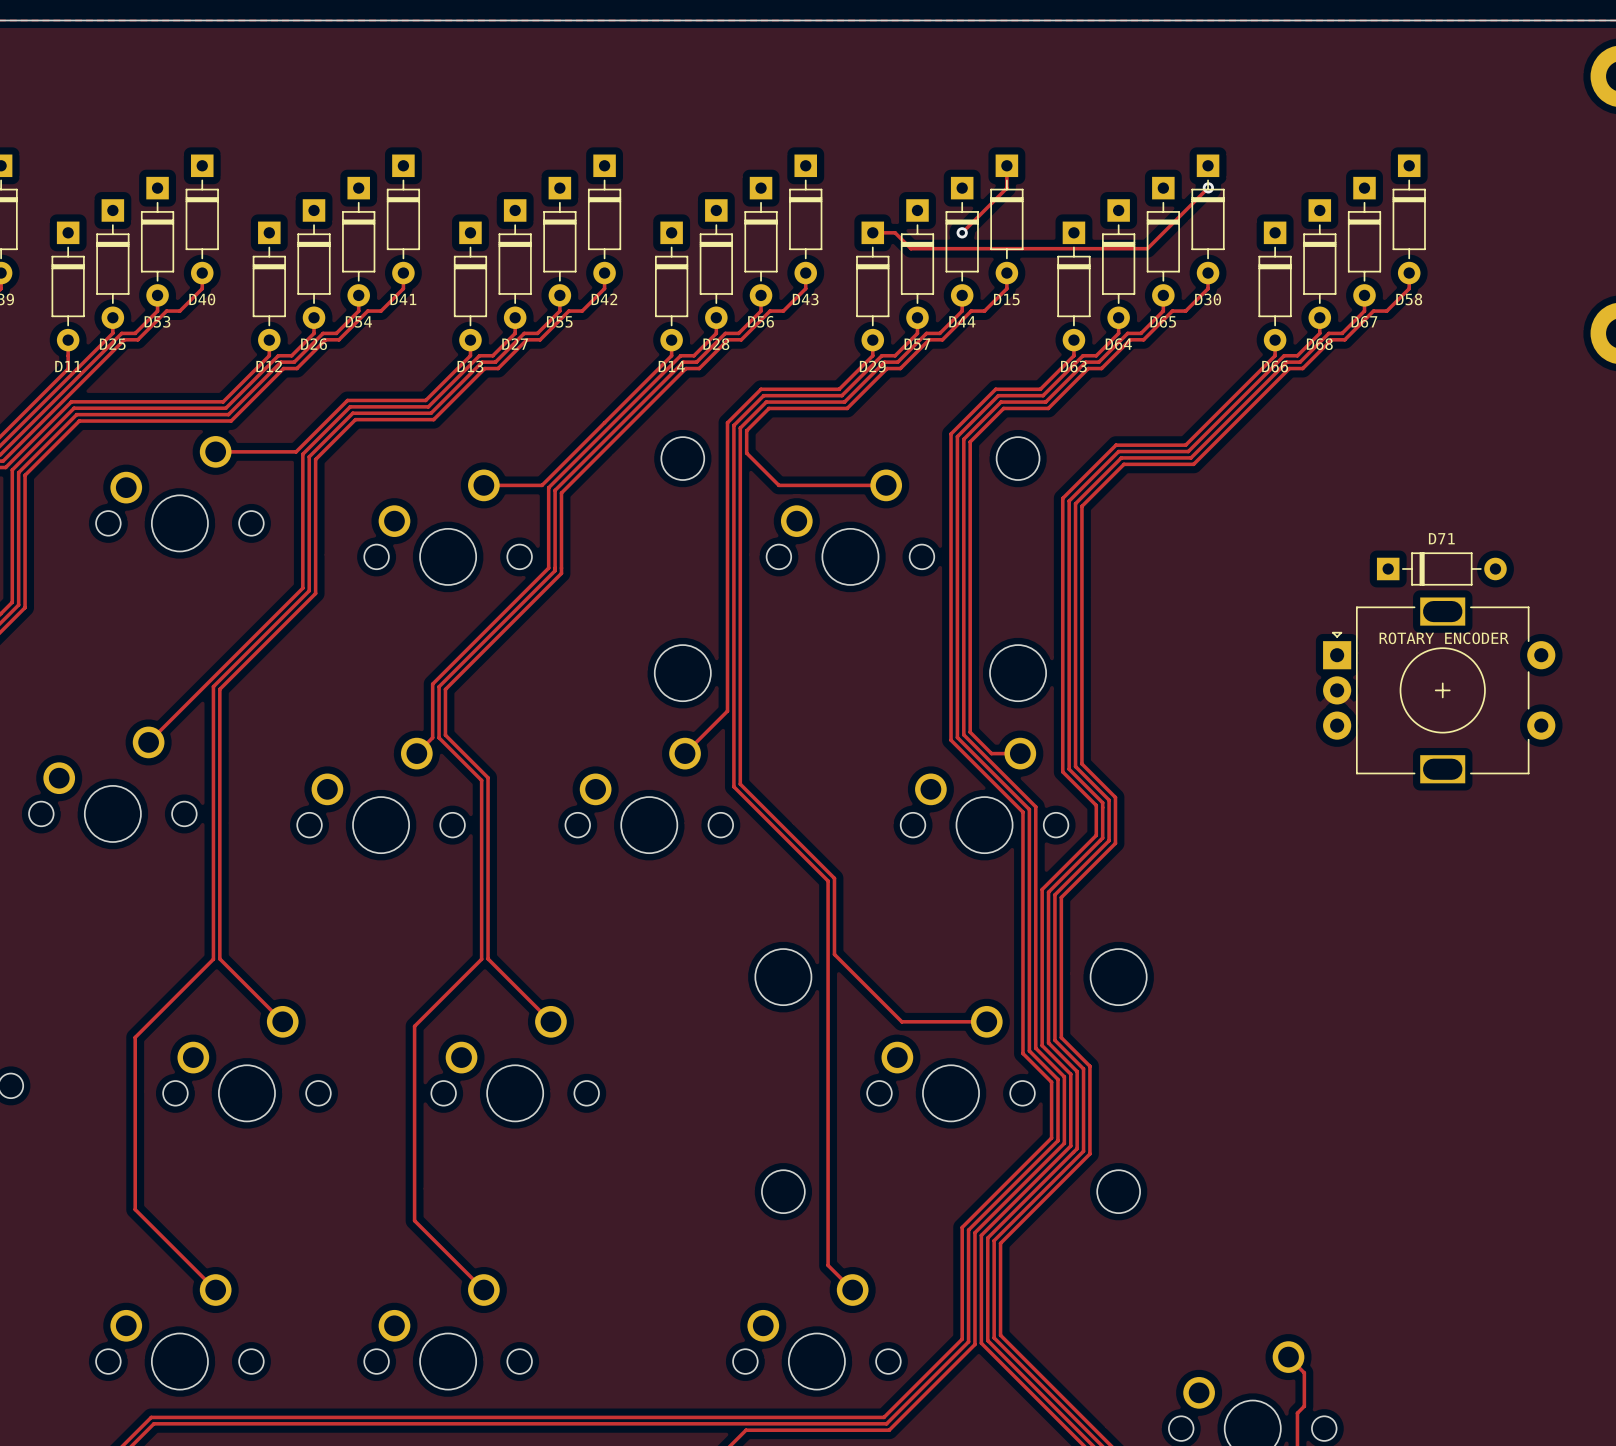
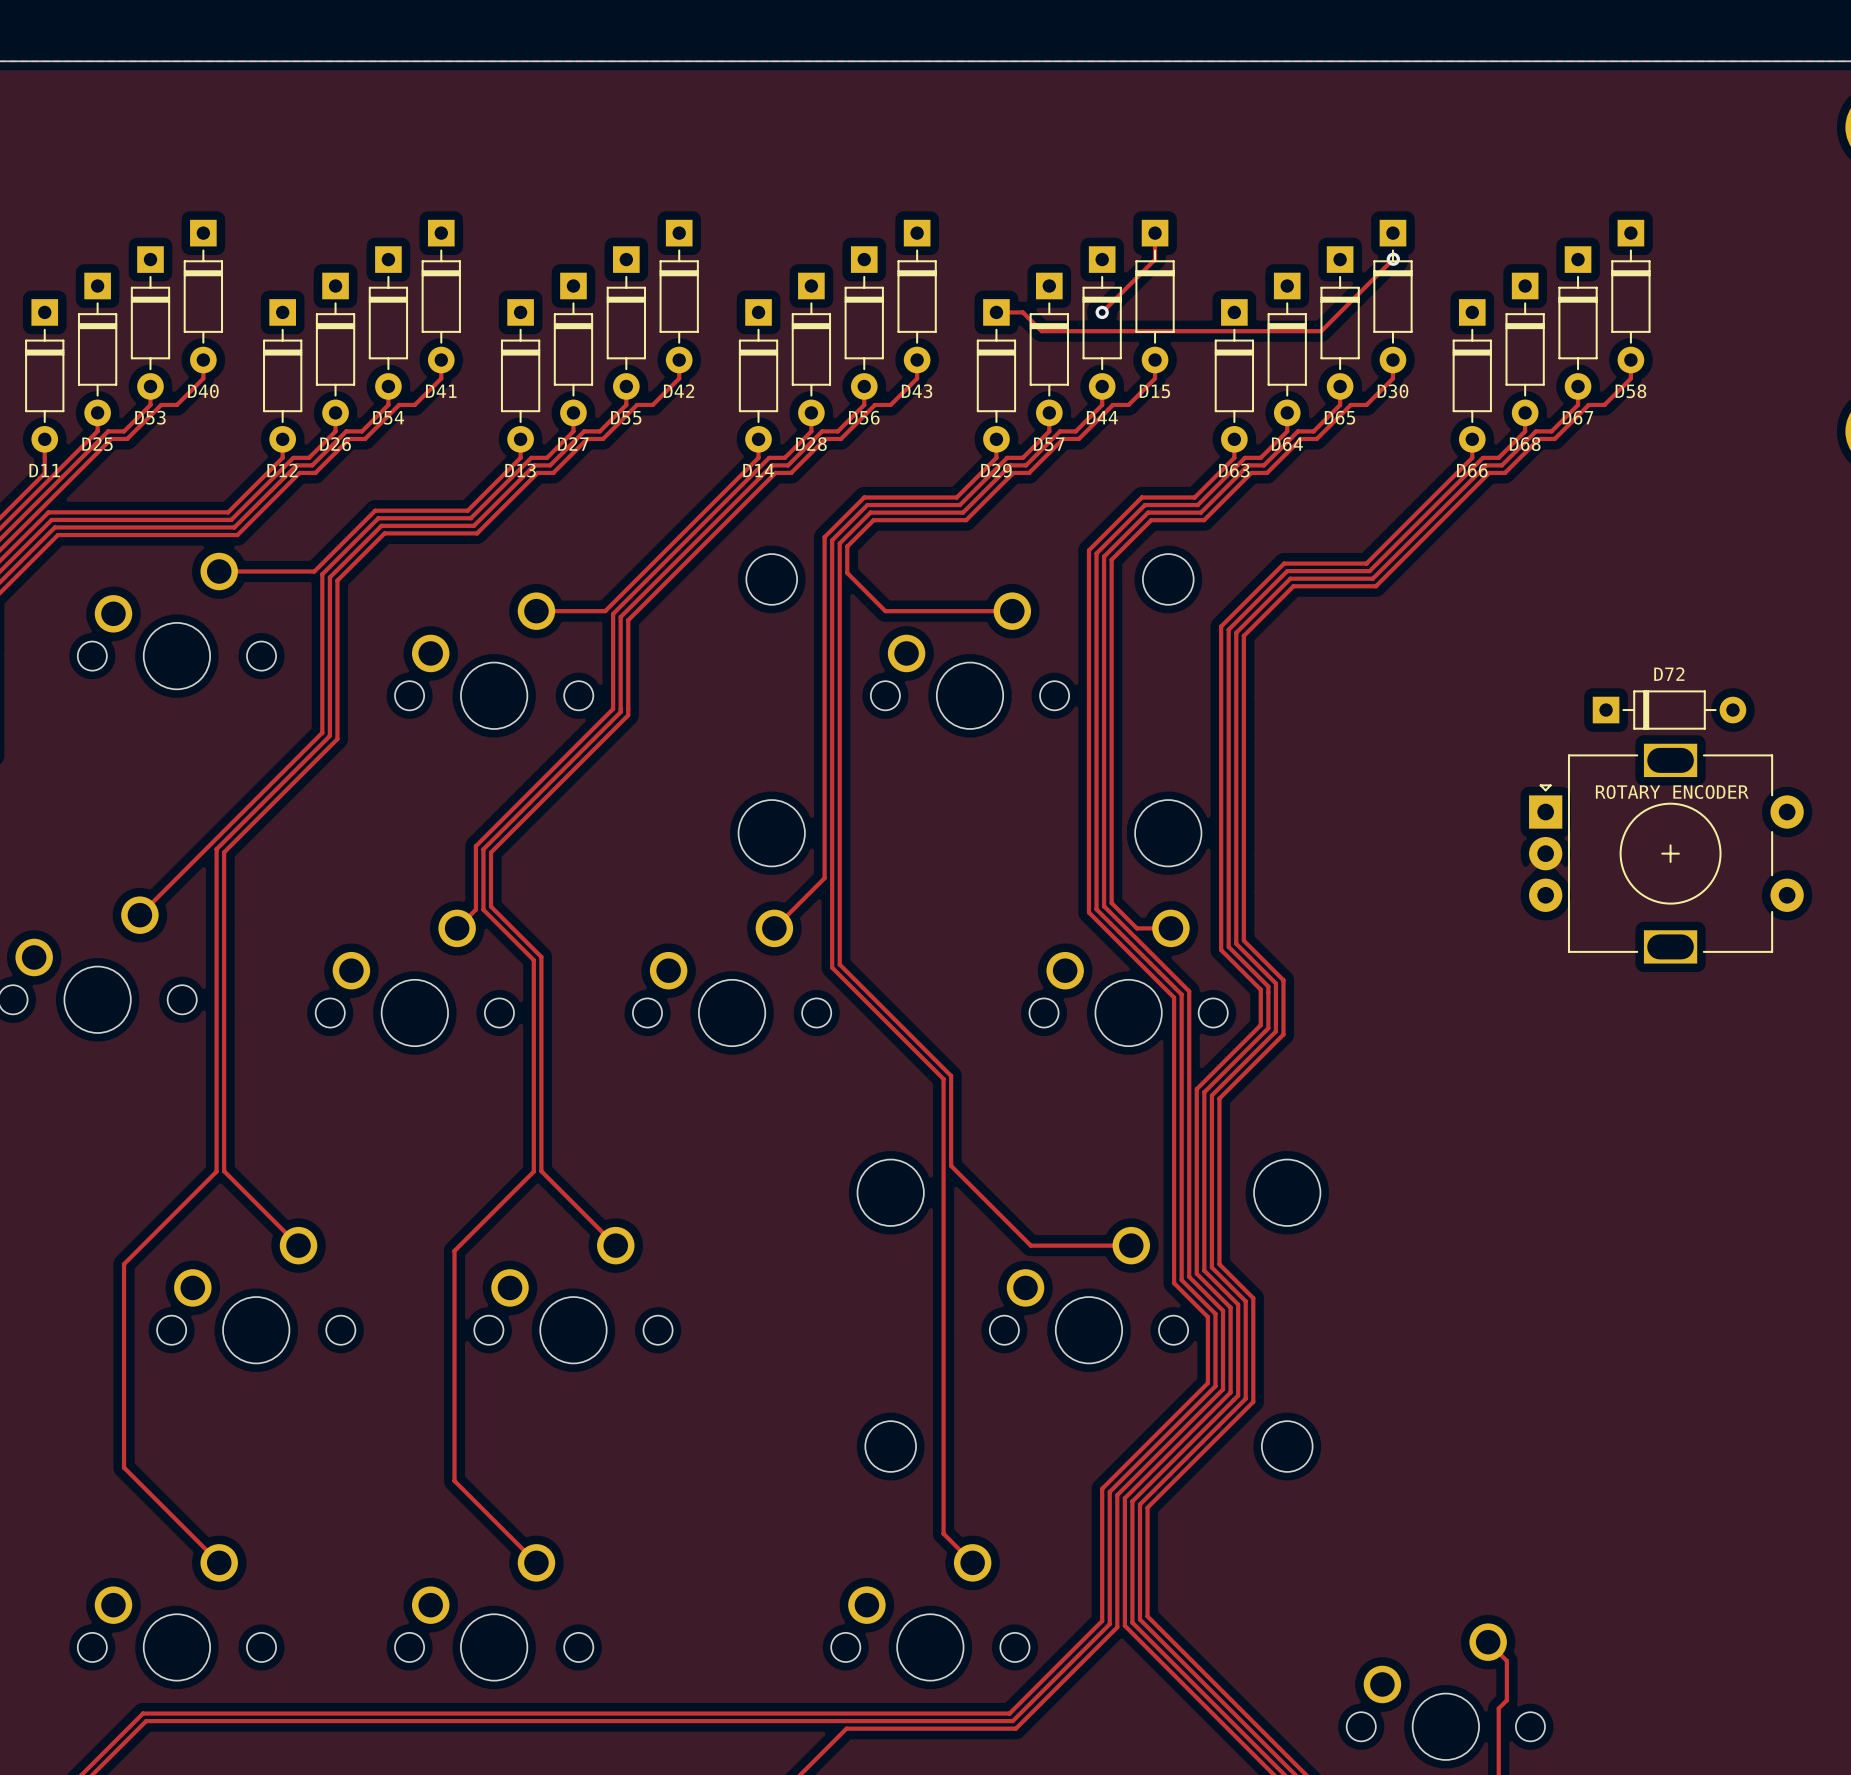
D71 name: D71 (1441, 538) -> D72 (1669, 674)

